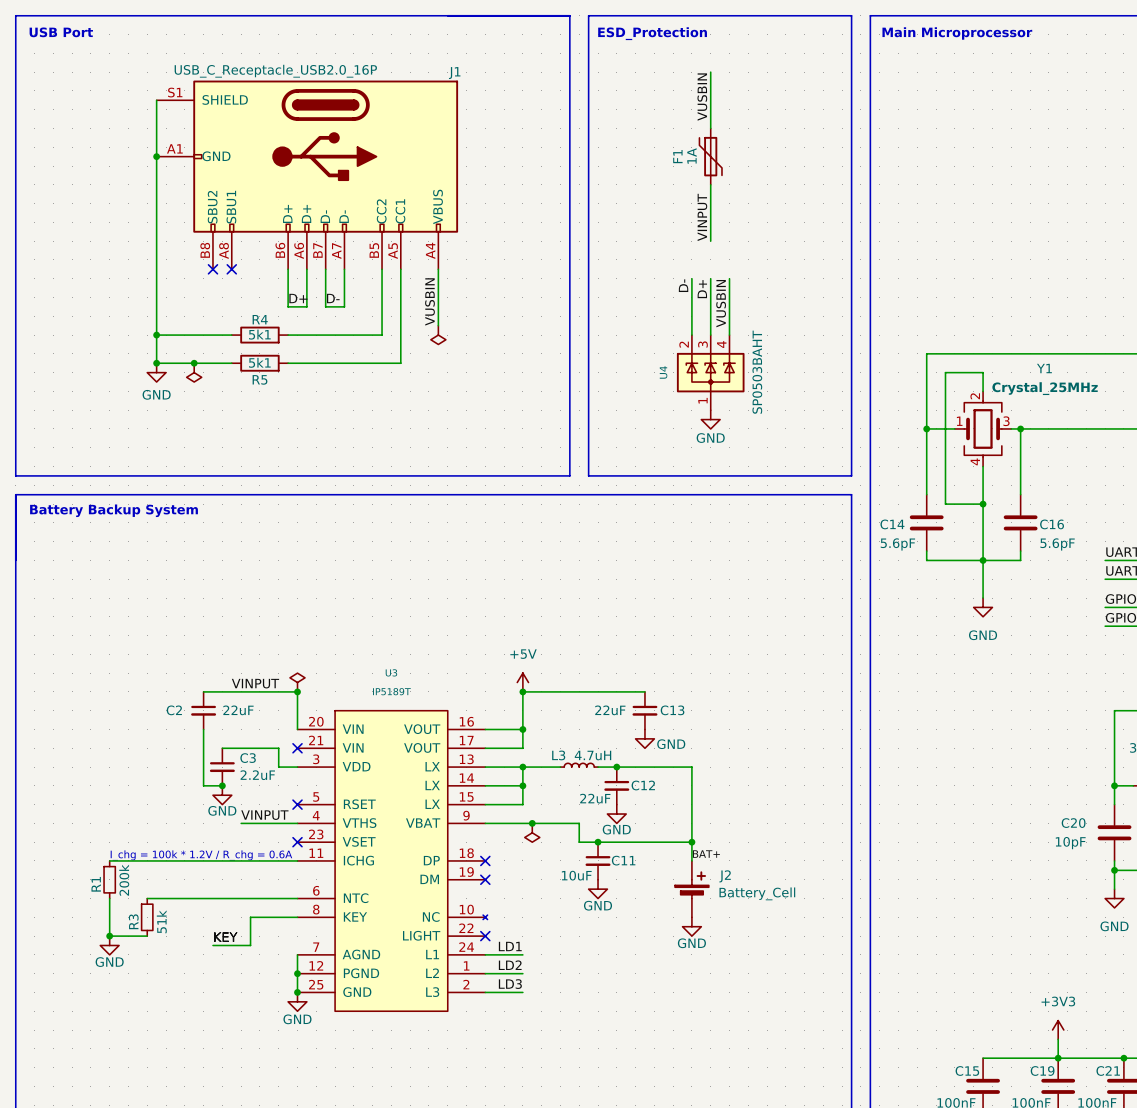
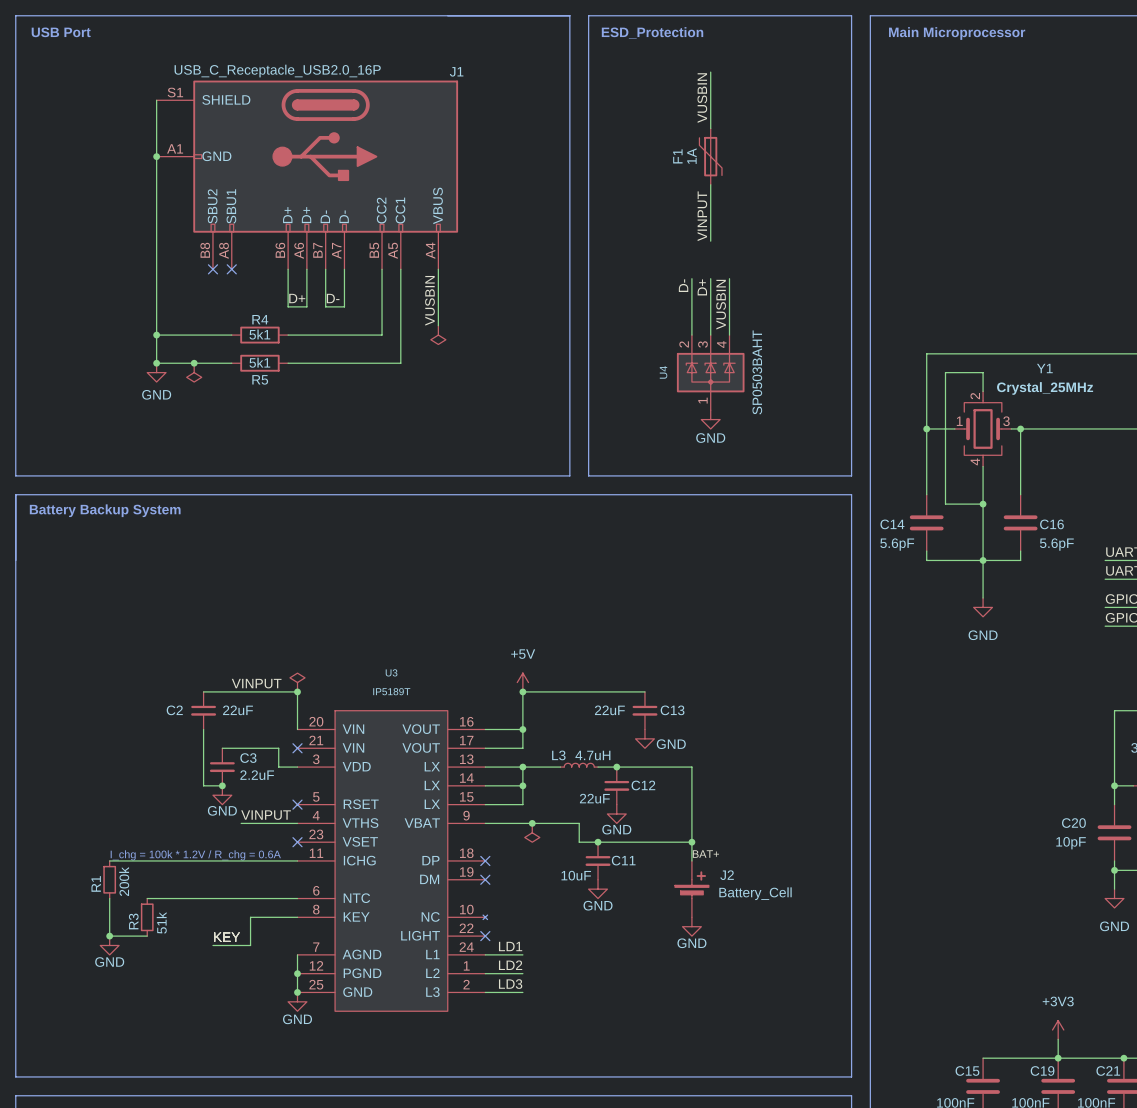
line: (15, 1076) (15, 1095) -> (15, 1076) (851, 1076)
line: (851, 1076) (851, 1095) -> (15, 1095) (851, 1095)

